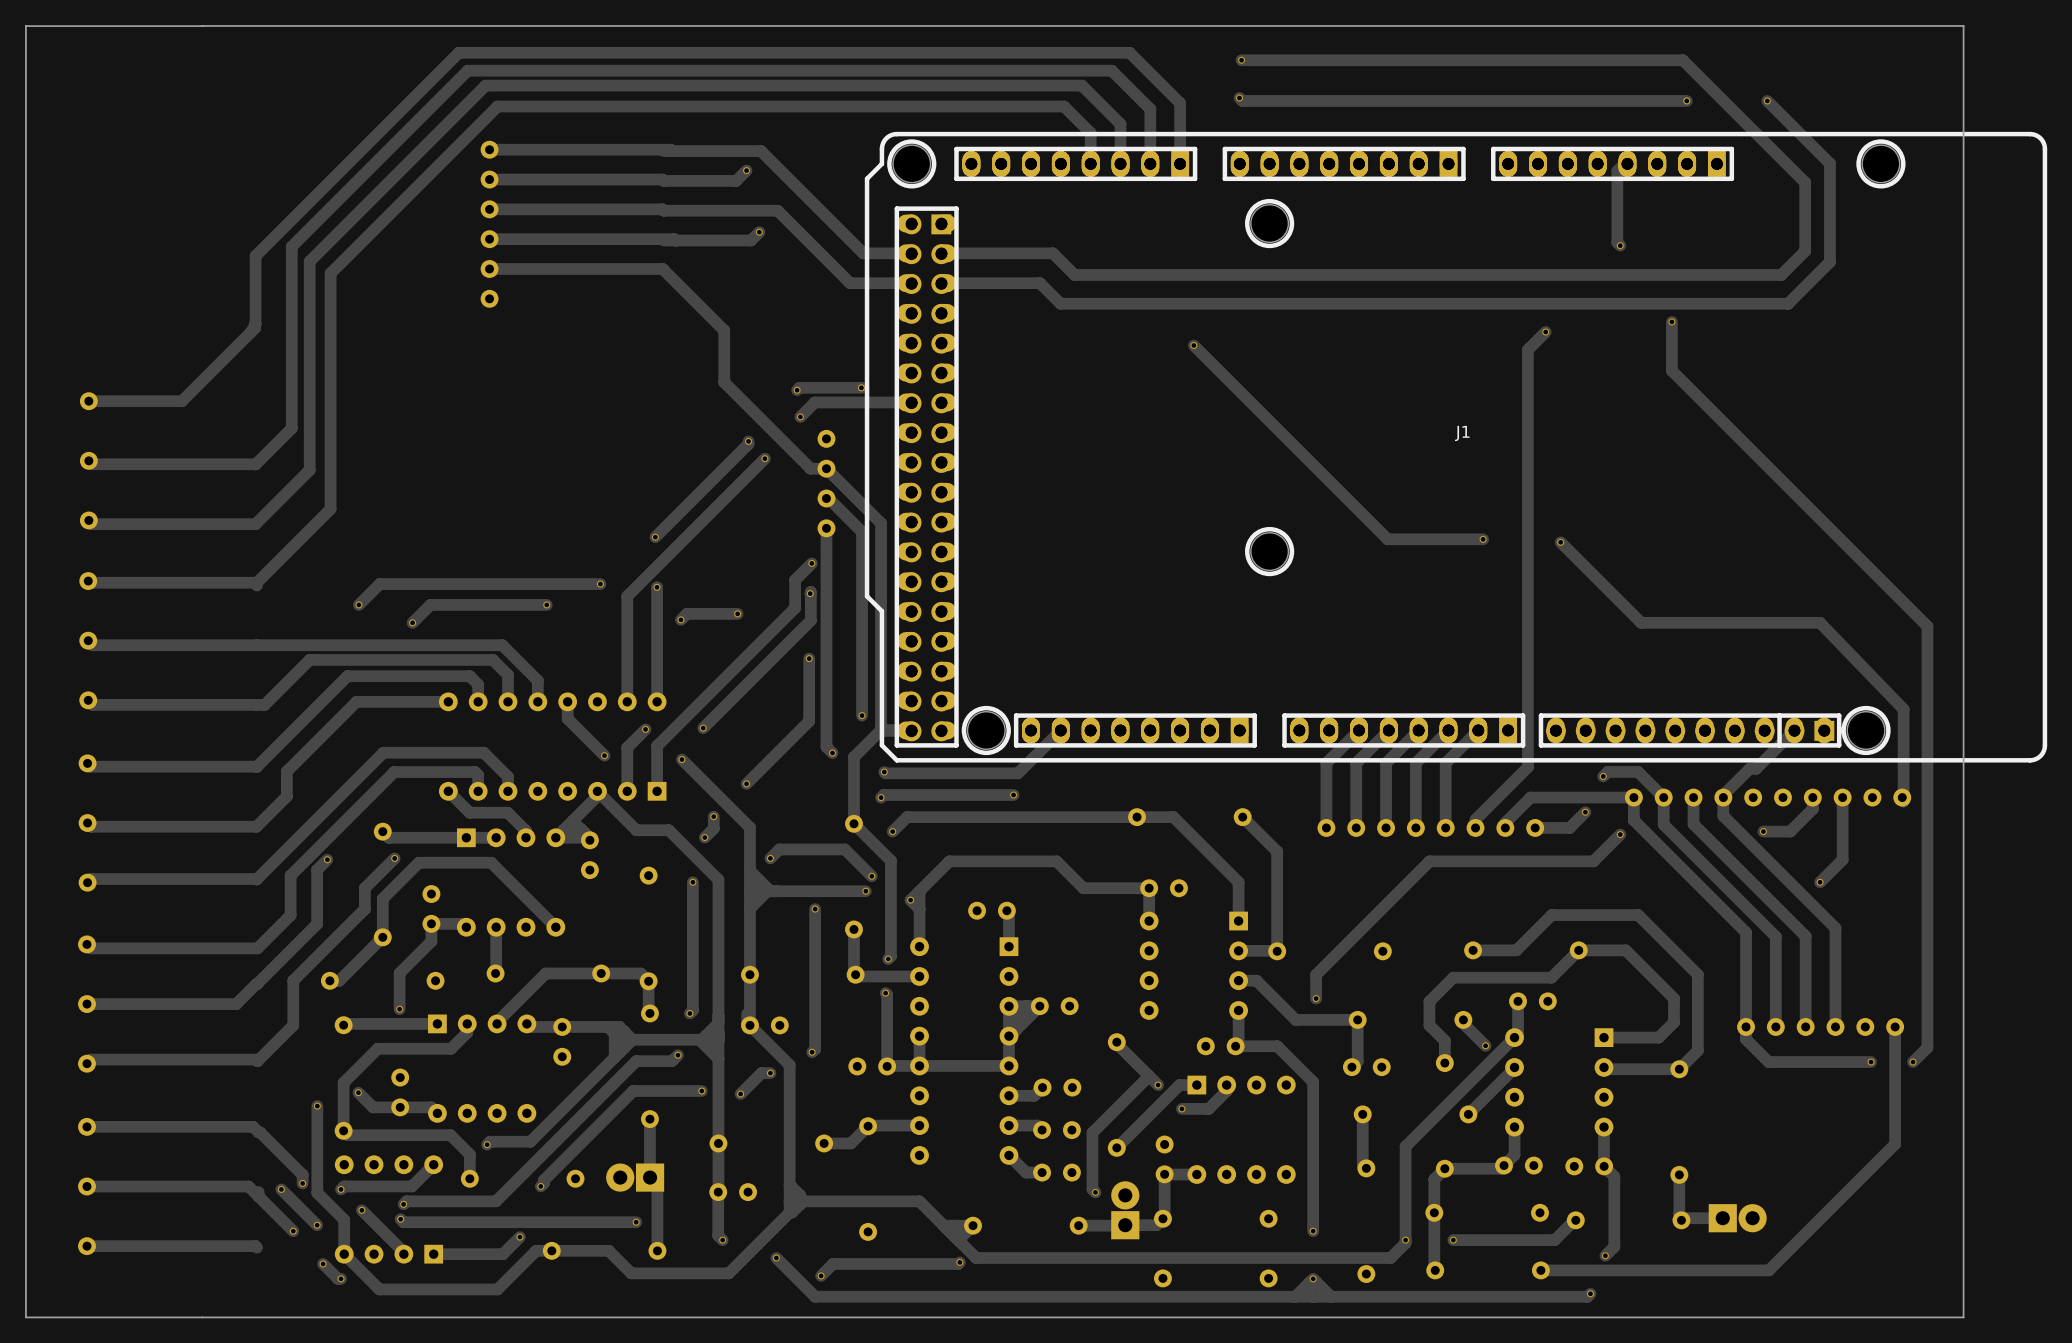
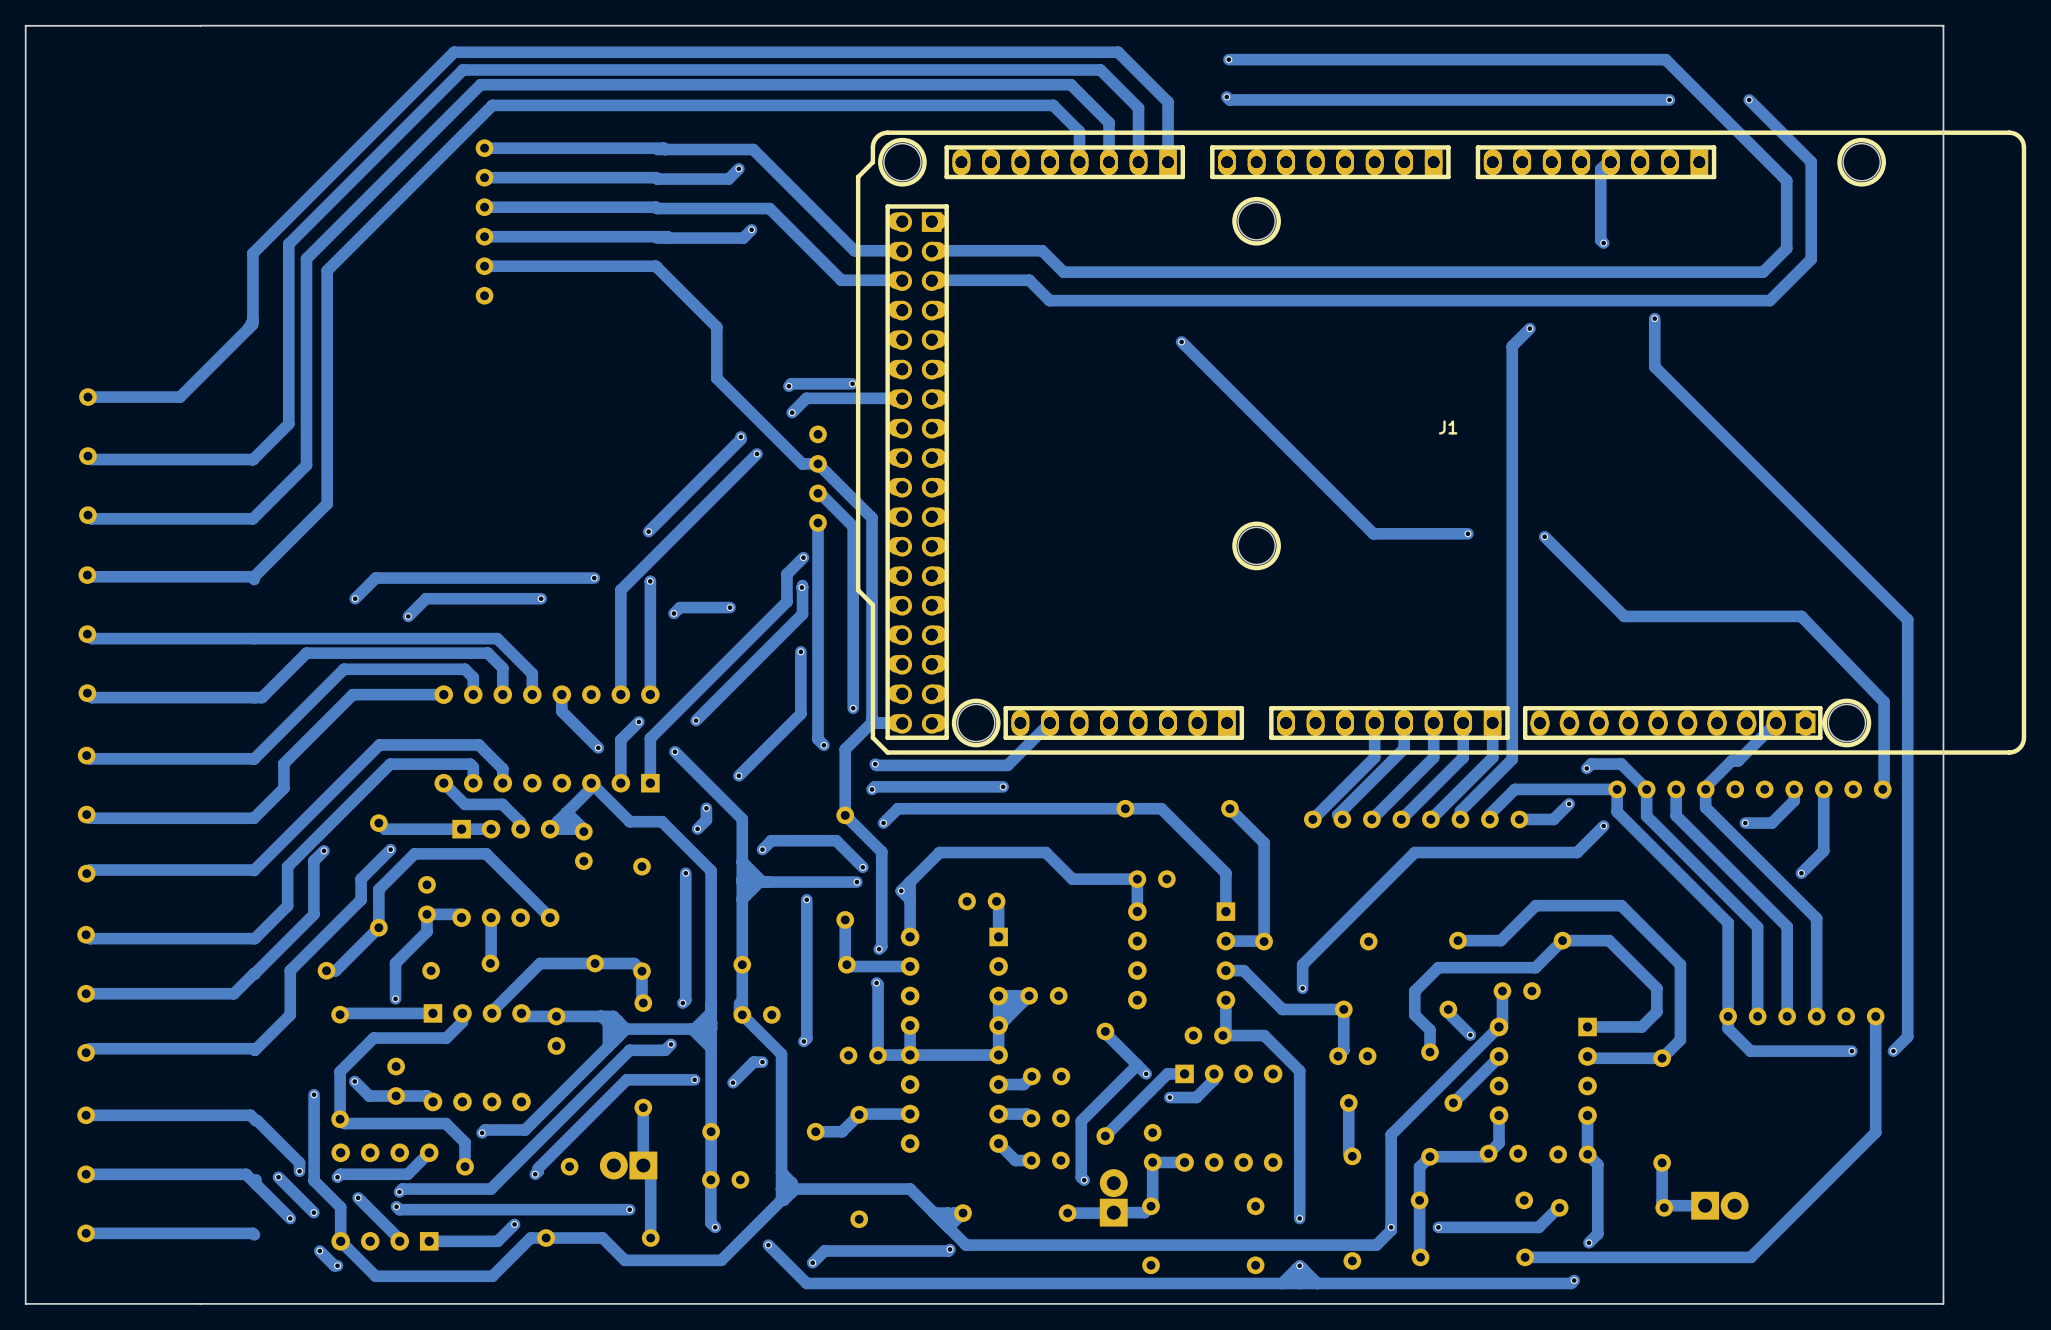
track: (1359, 730) (1326, 763) (1326, 827) -> none
track: (1388, 730) (1356, 763) (1356, 827) -> (1374, 723) (1374, 757) (1312, 819)
track: (1418, 730) (1386, 763) (1386, 827) -> (1404, 723) (1404, 748) (1337, 814) (1342, 819)
track: (1448, 730) (1415, 763) (1415, 827) -> (1433, 723) (1433, 757) (1371, 819)
track: (1478, 730) (1445, 763) (1445, 827) -> (1463, 723) (1463, 757) (1401, 819)
track: none -> (1492, 723) (1492, 757) (1430, 819)

